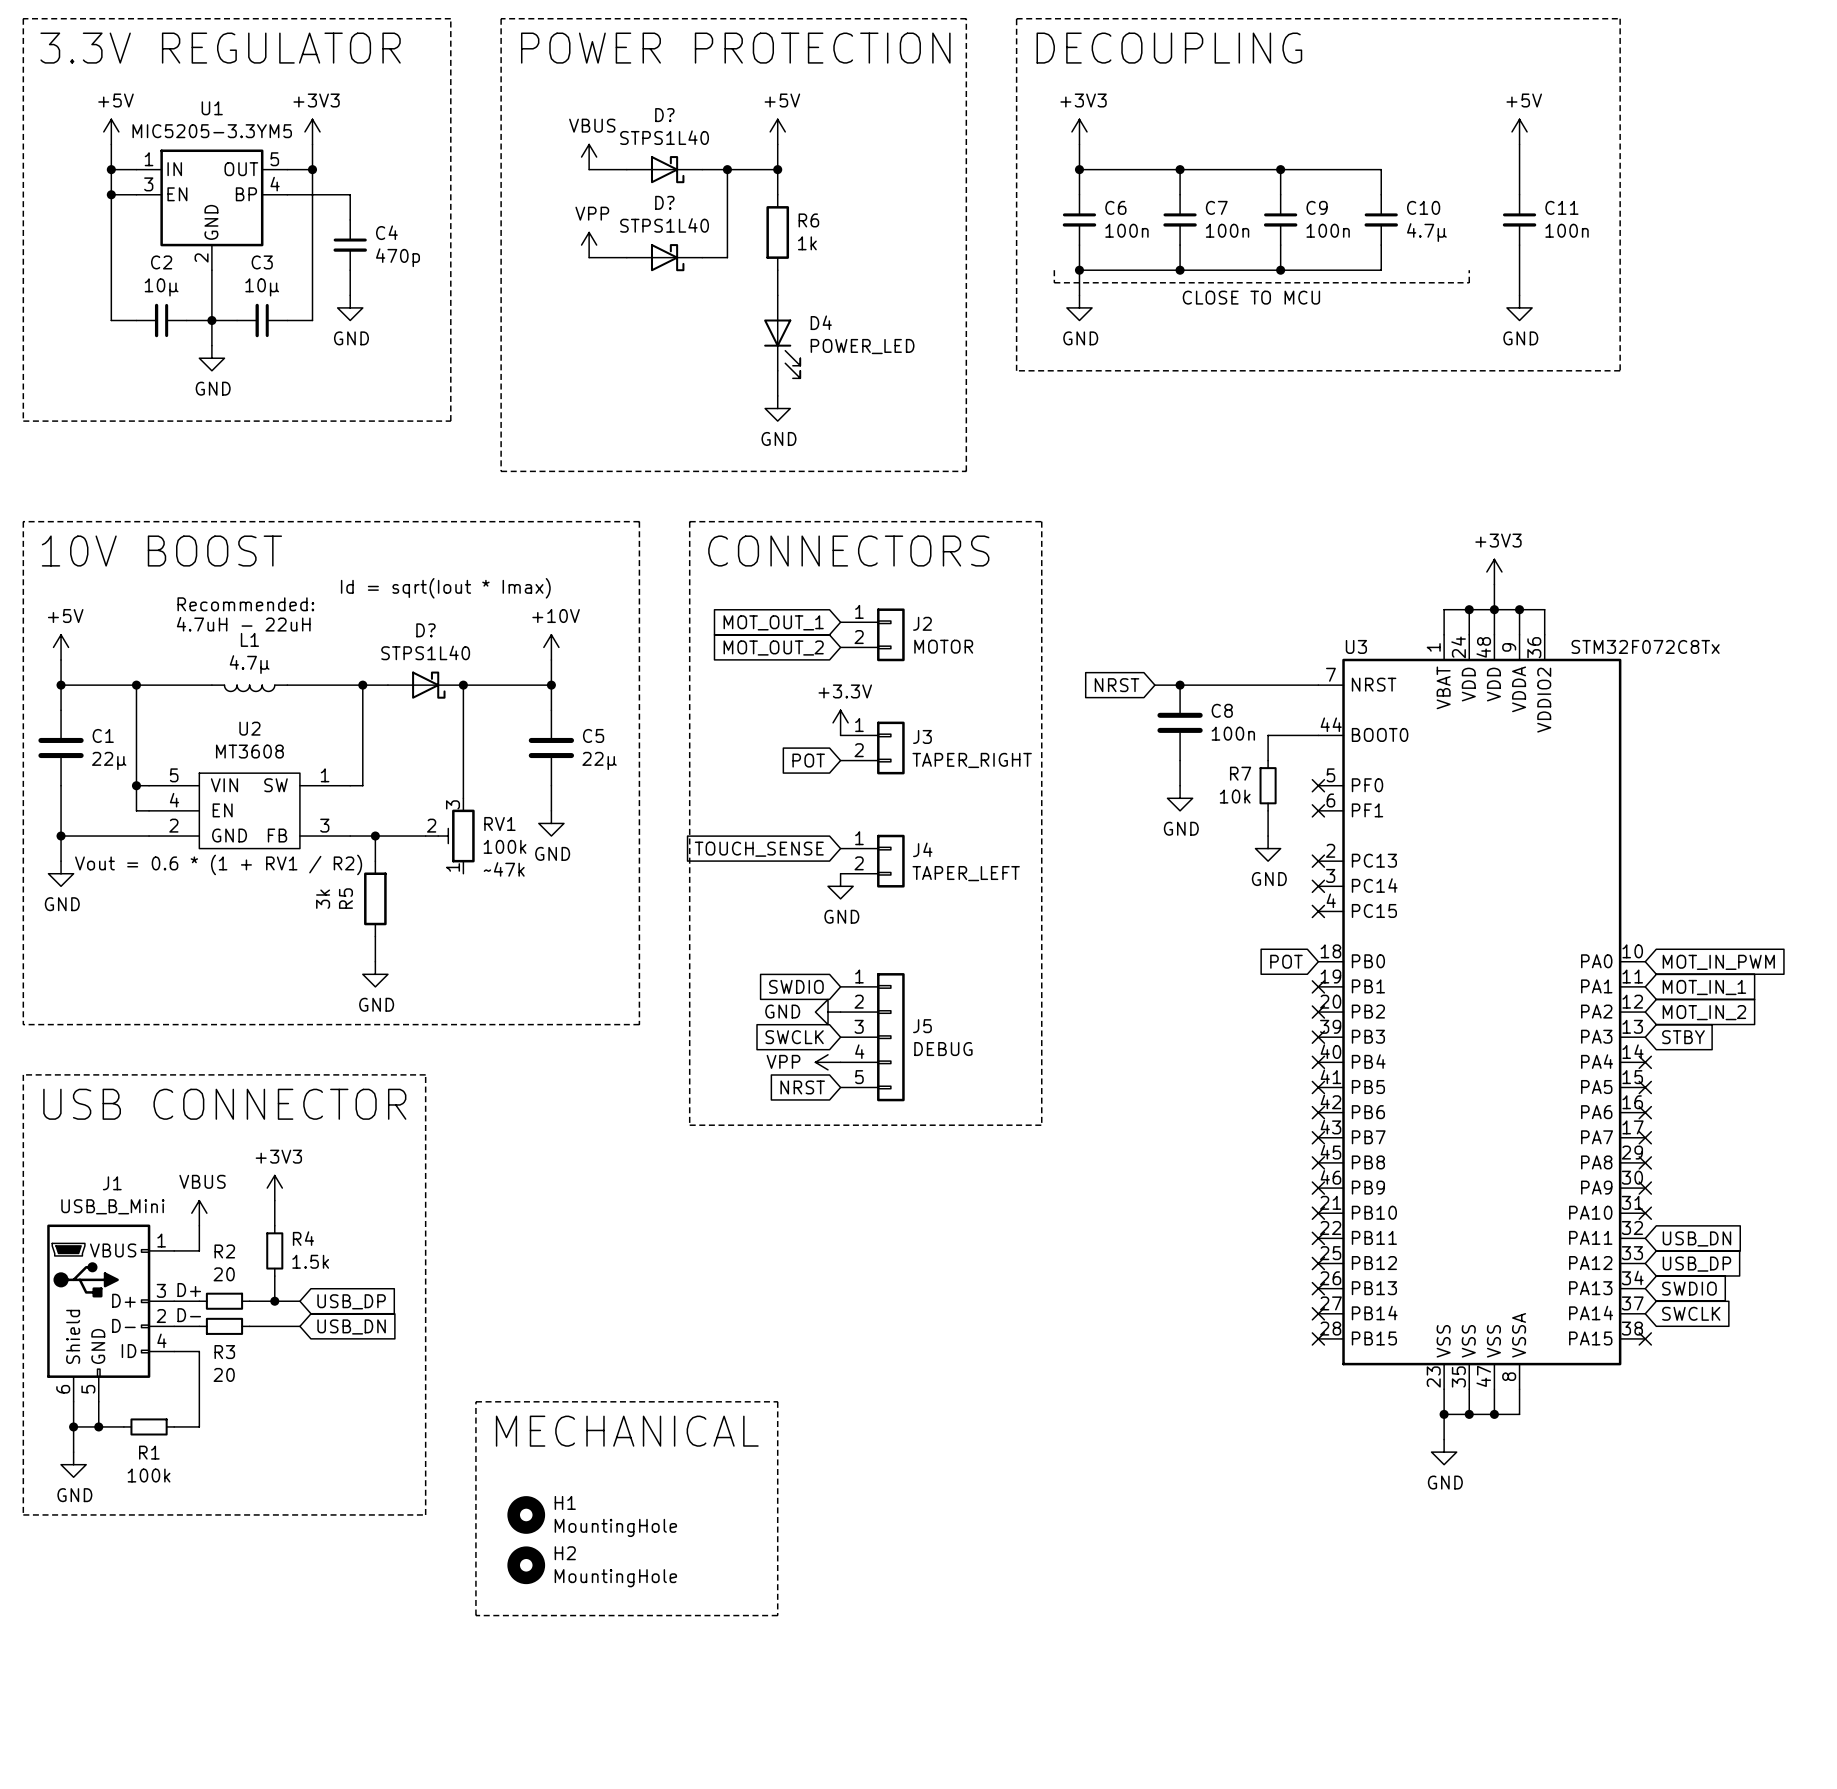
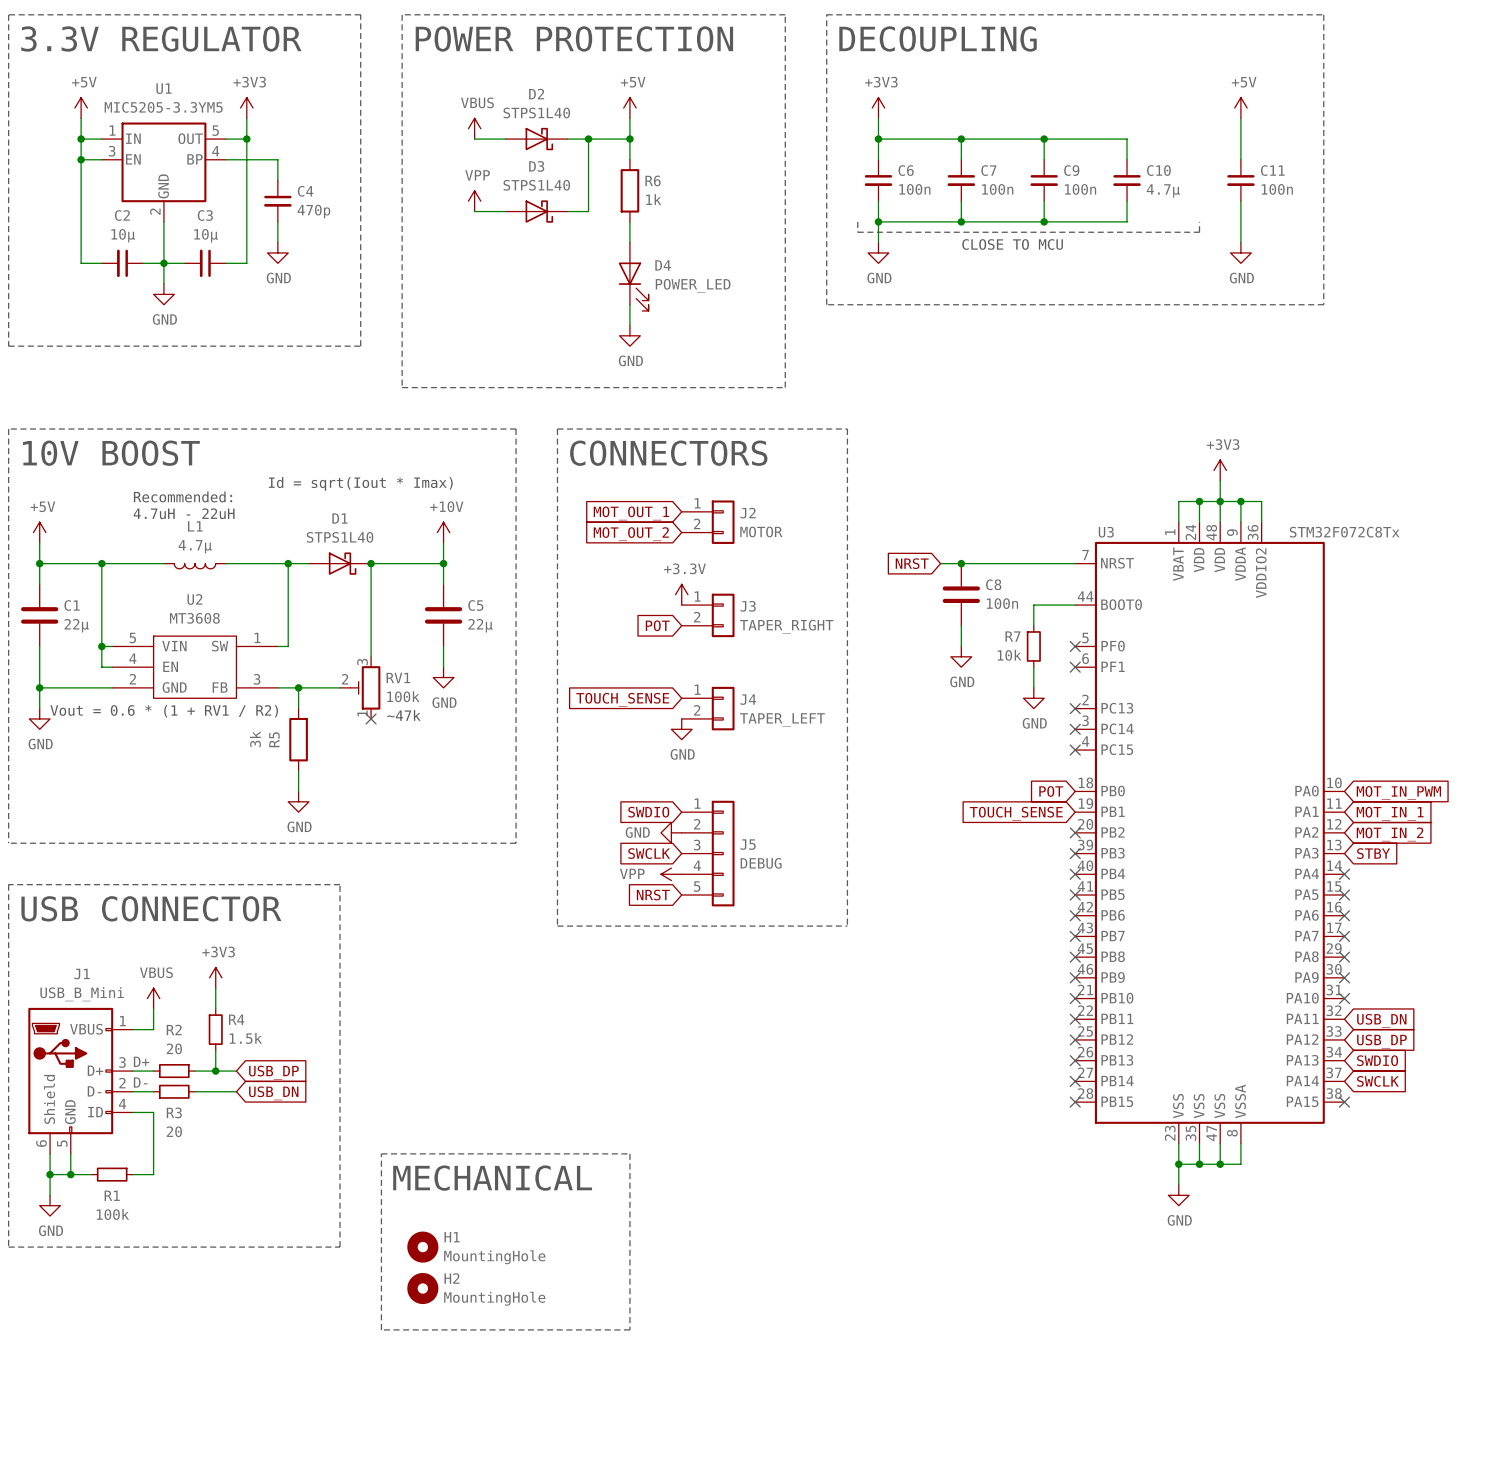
D? name: D? (664, 115) -> D2 (536, 94)
D? name: D? (664, 202) -> D3 (536, 166)
D? name: D? (425, 630) -> D1 (339, 518)
no-connect mark: none -> (371, 718)
no-connect mark: (1318, 986) -> none
global label: none -> TOUCH_SENSE (1016, 813)

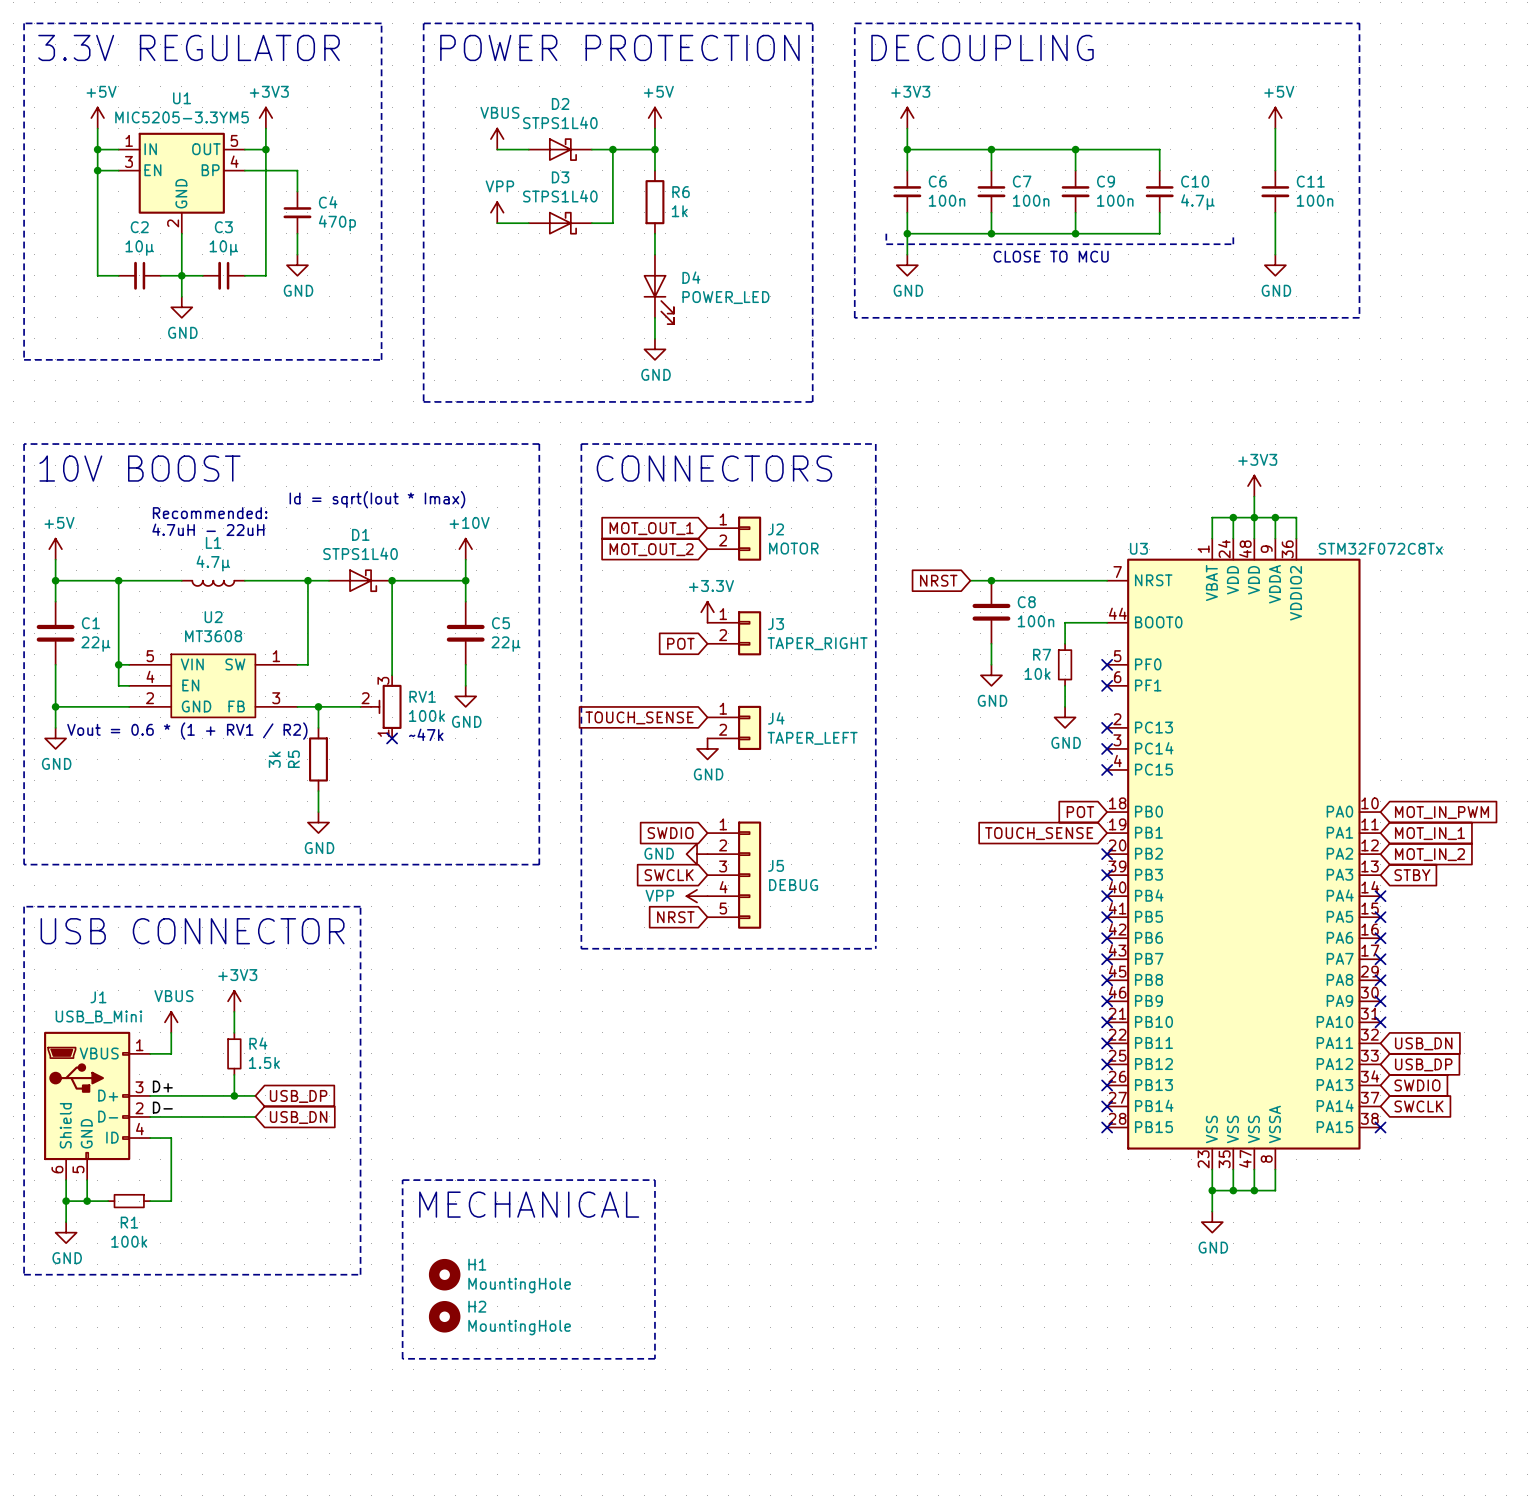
wire: none -> (171, 1095) (213, 1095)
R2: 20 (174, 1071) -> none
wire: none -> (171, 1116) (213, 1116)
R3: 20 (174, 1091) -> none

